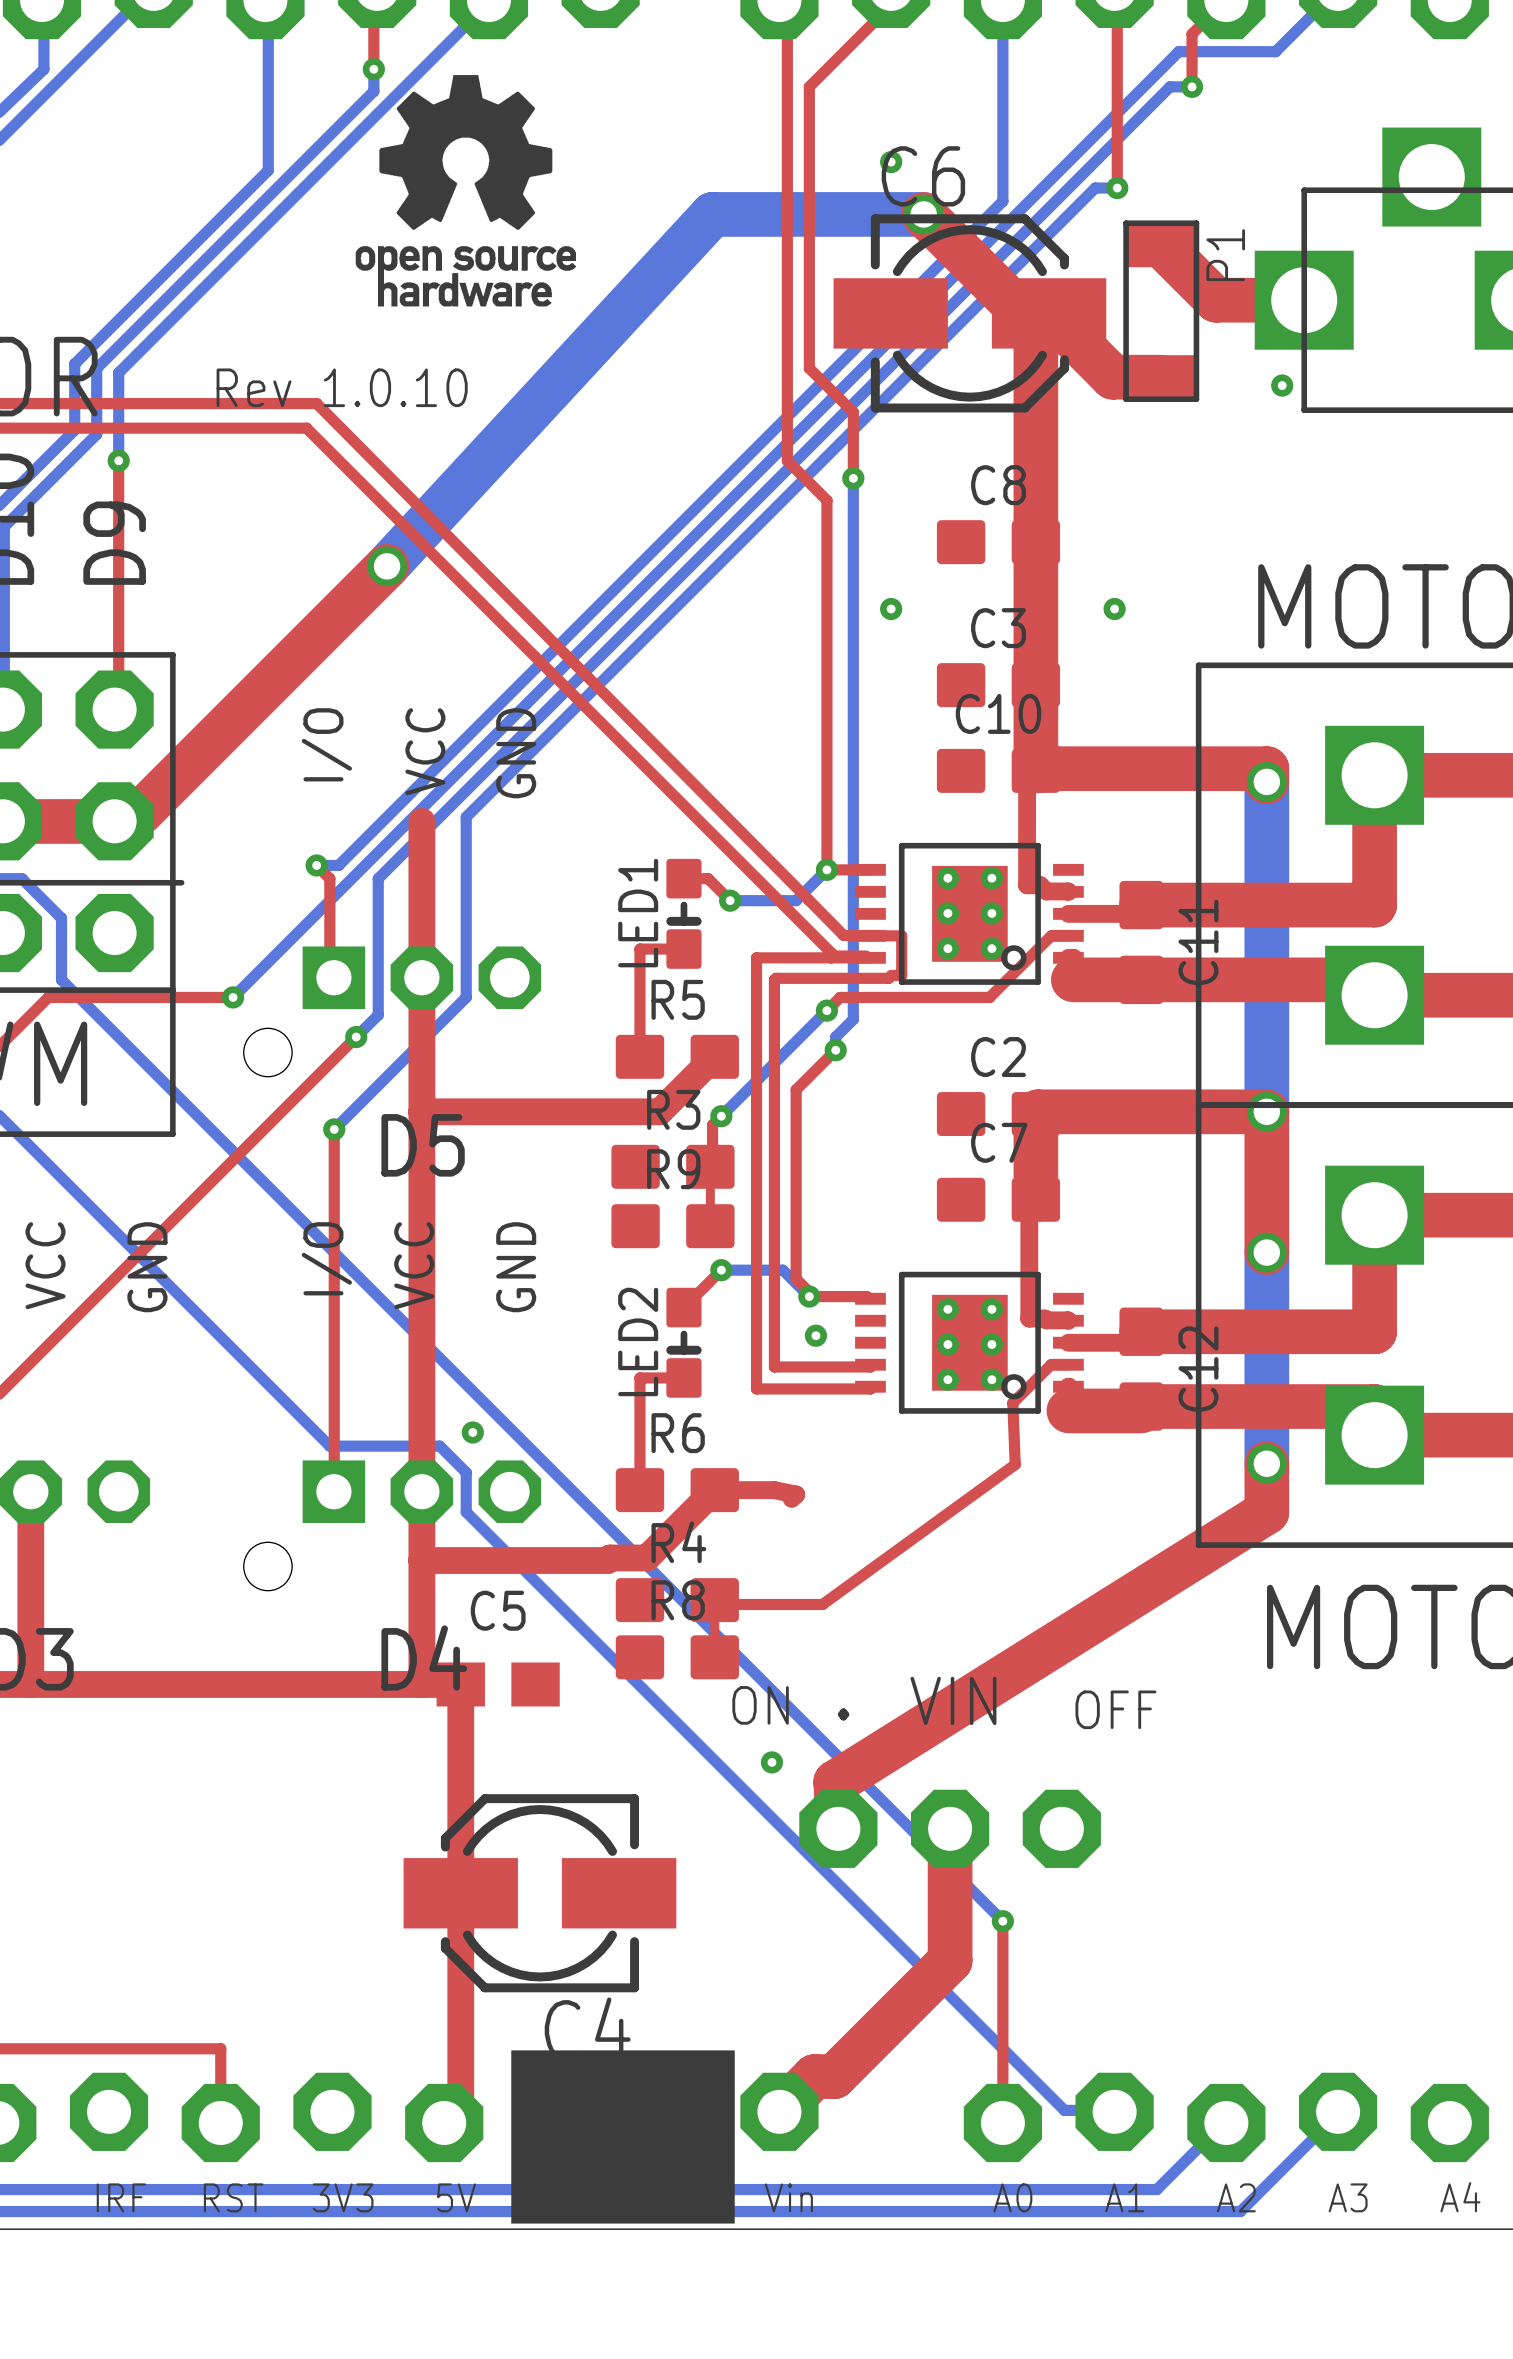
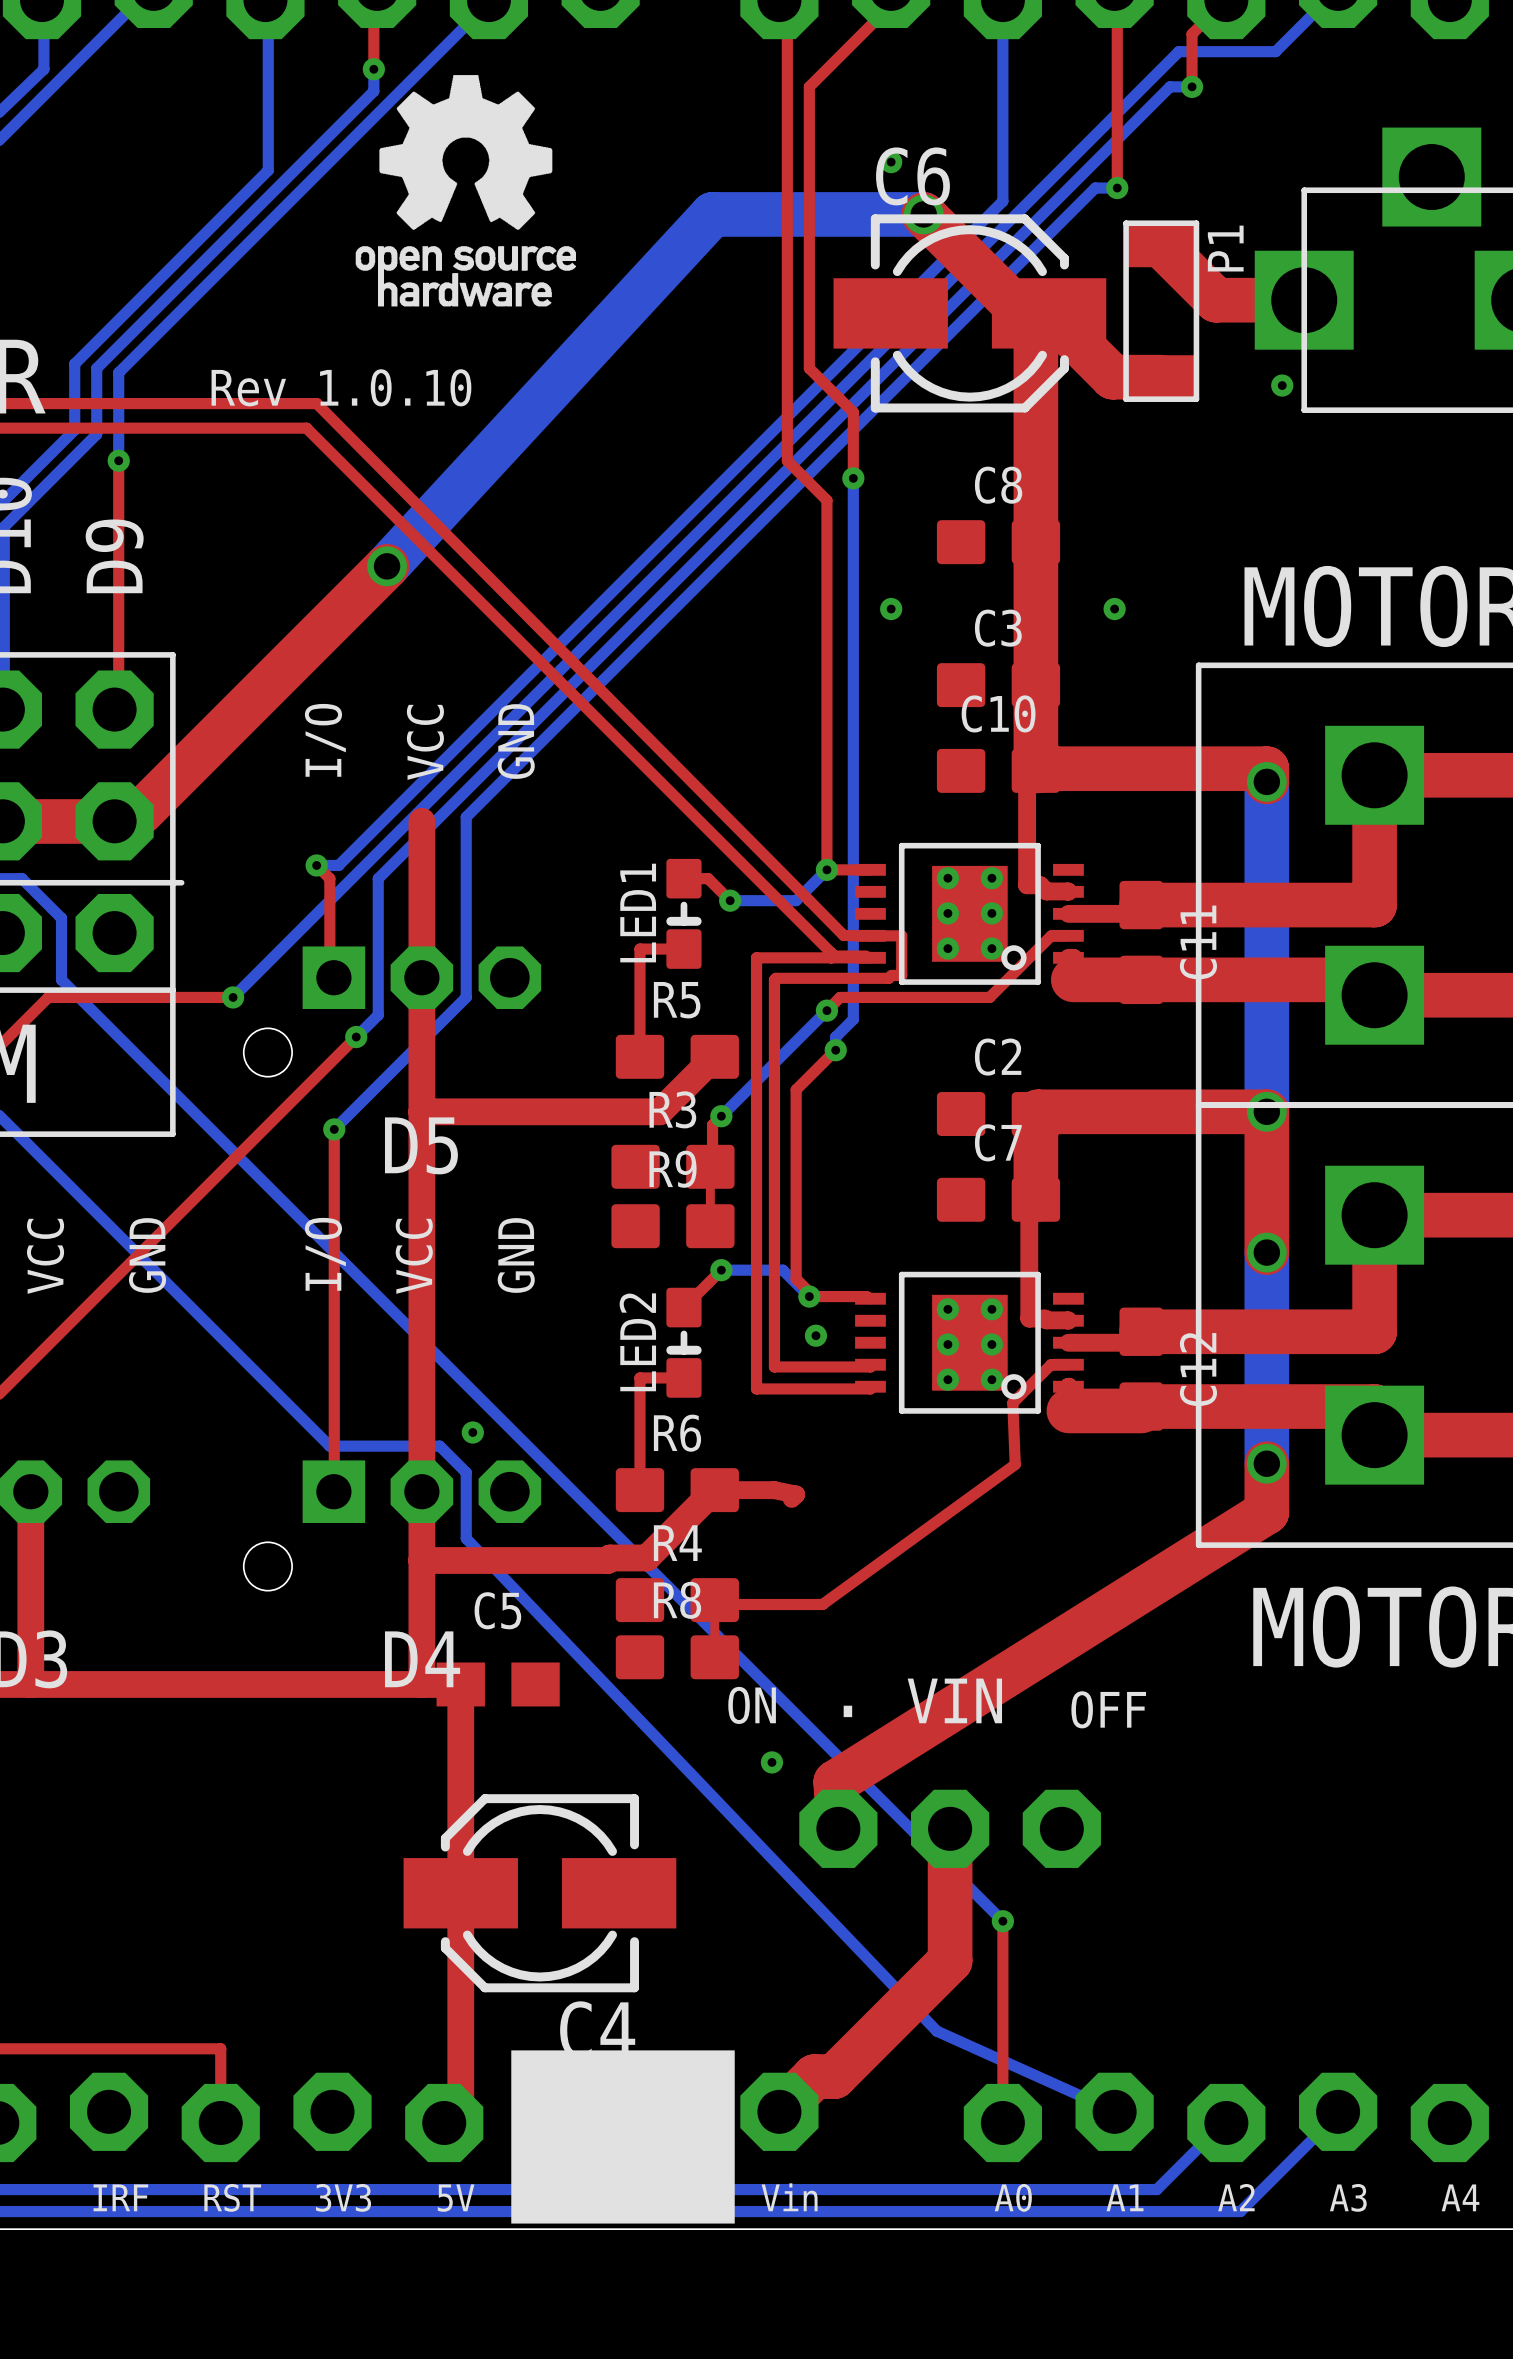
bottom track: (466, 1512) (1064, 2110) (1112, 2110) -> (466, 1512) (466, 1538) (936, 2031) (1112, 2110)

